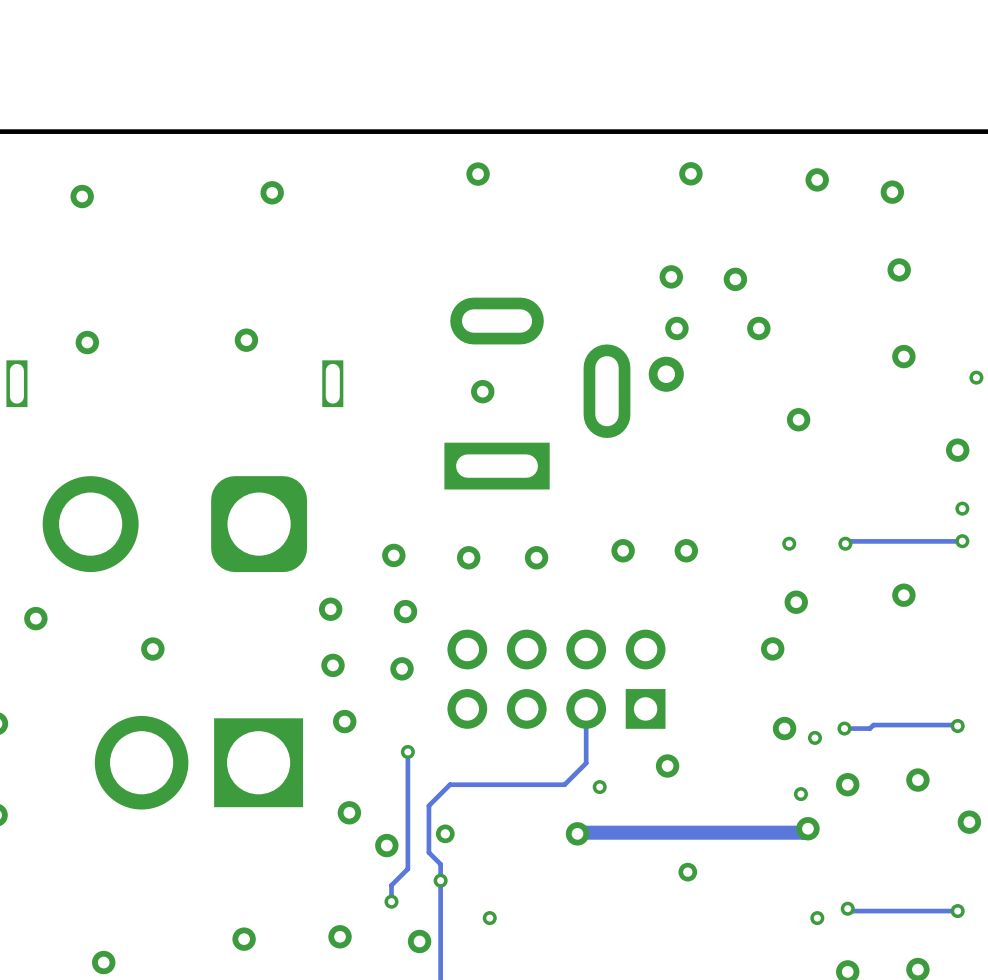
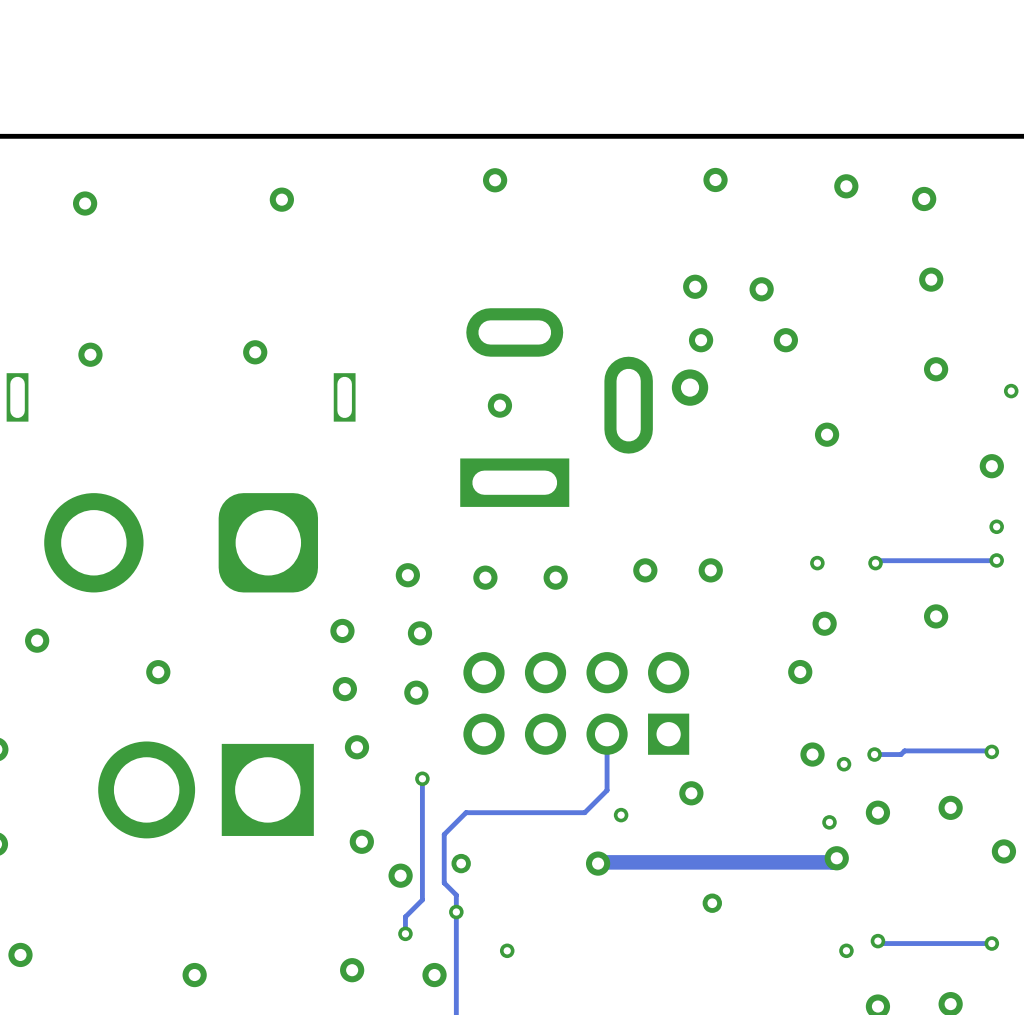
via: none -> (20, 954)
via: (244, 939) -> none
via: none -> (194, 975)
via: (103, 962) -> none

